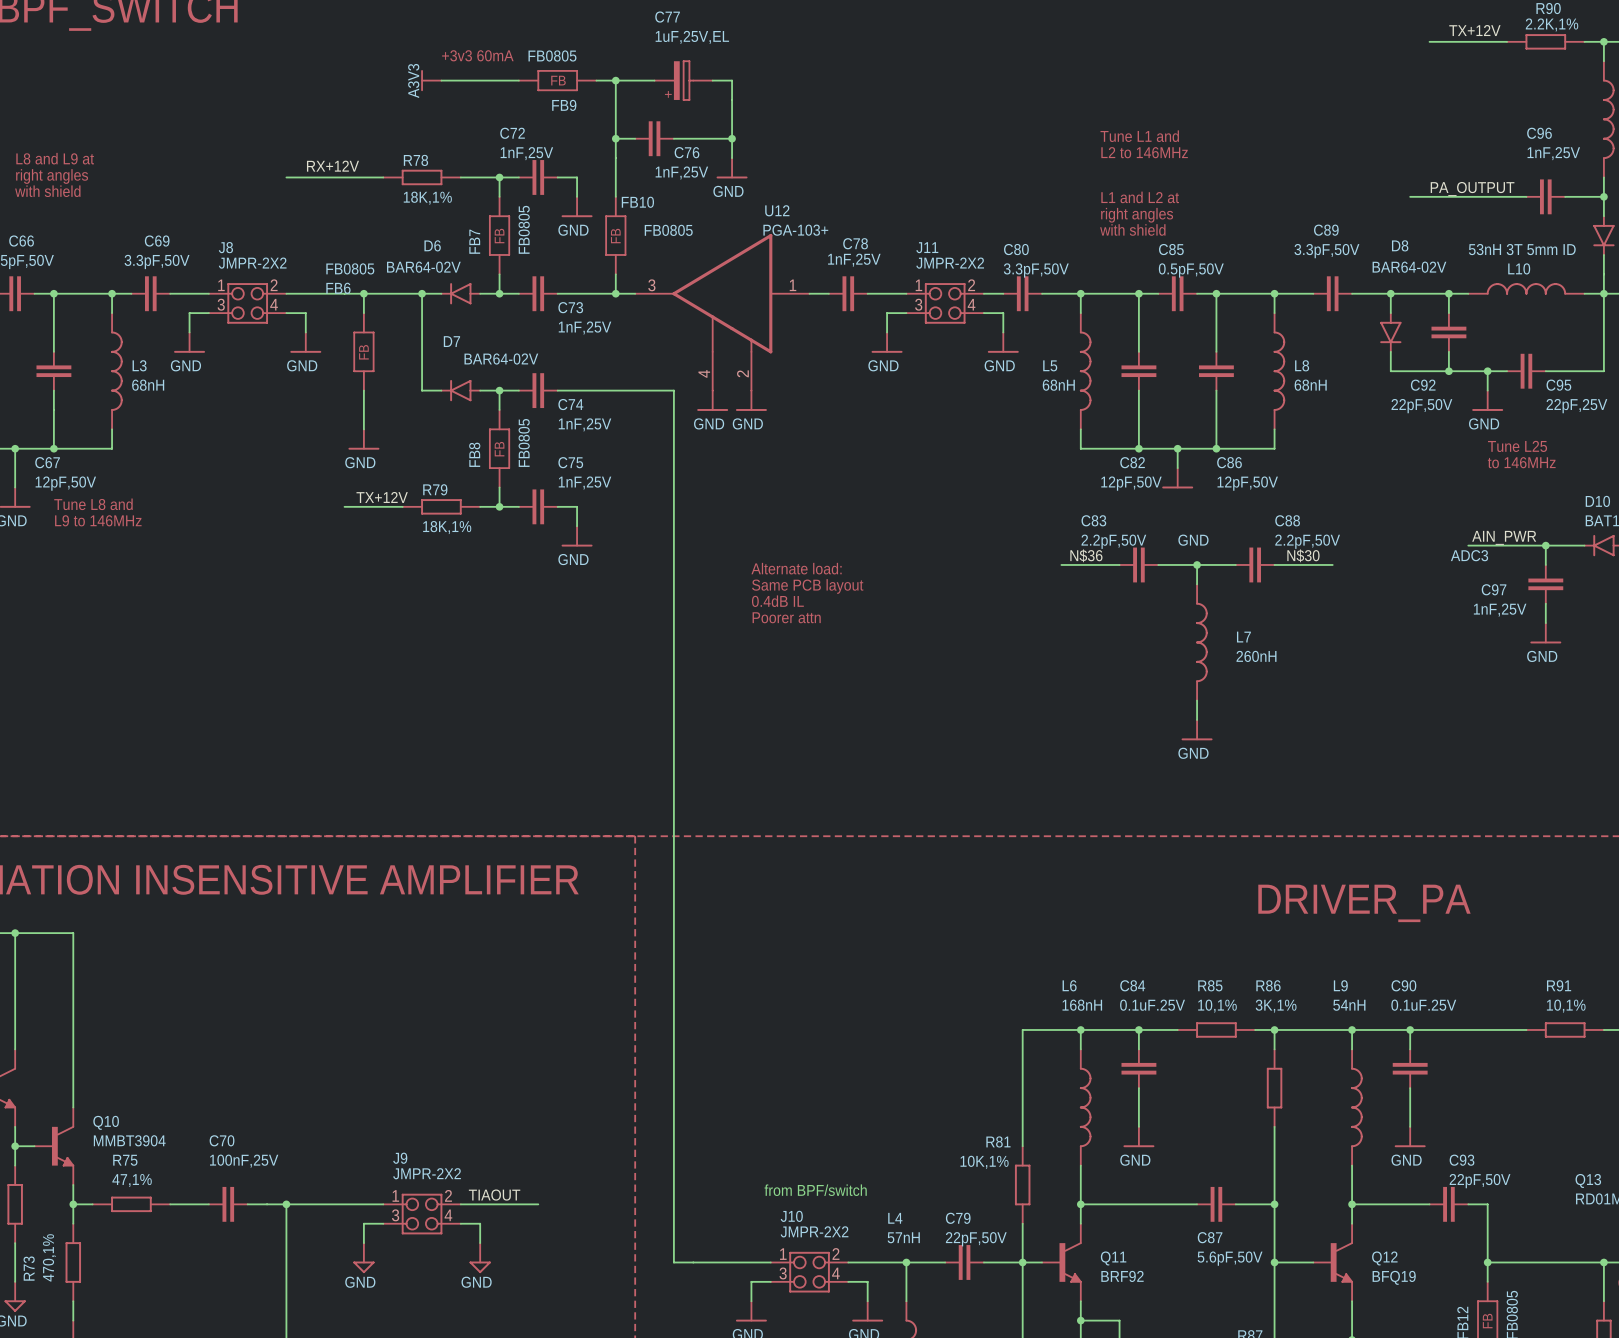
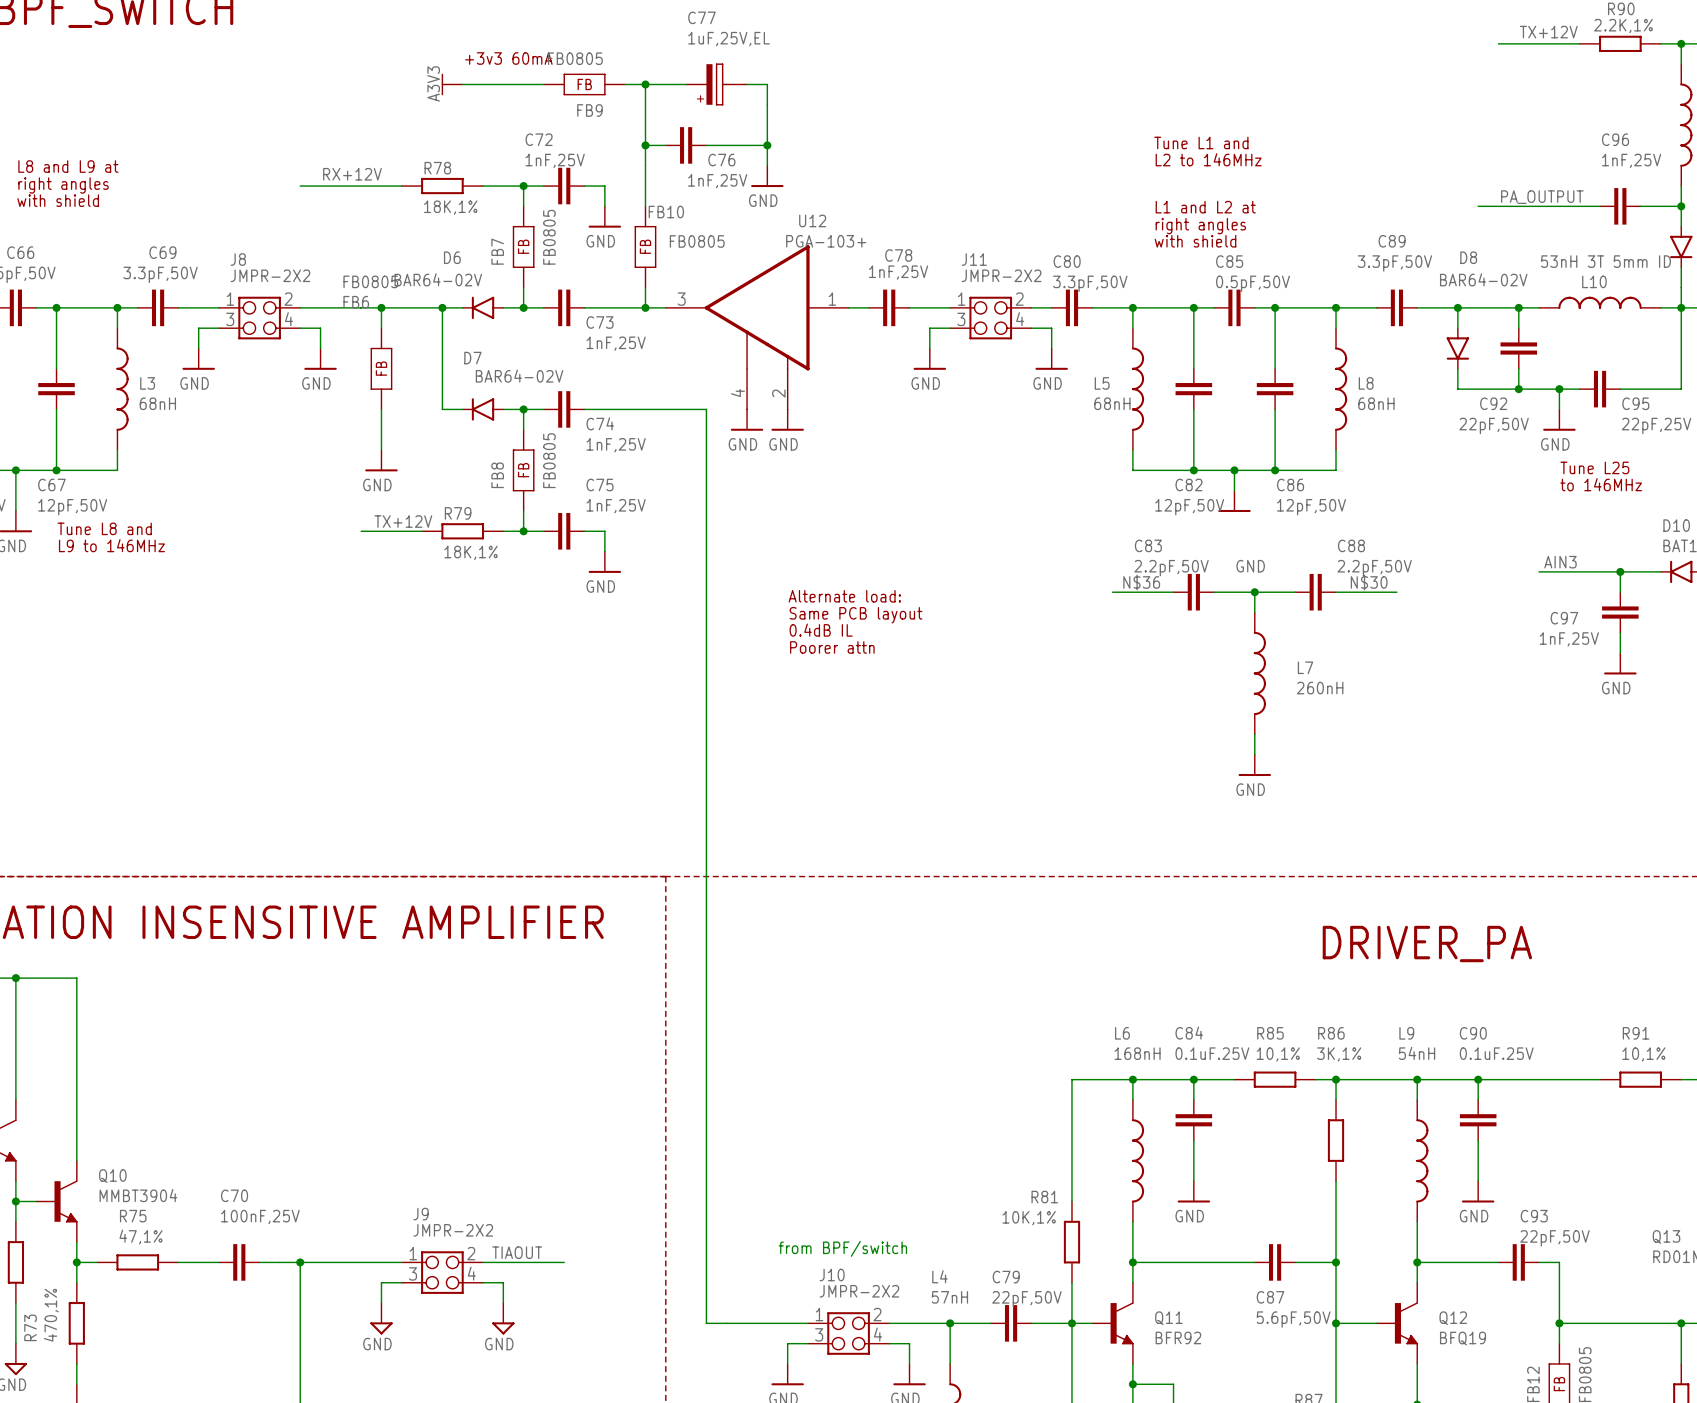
label: AIN_PWR (1504, 537) -> AIN3 (1560, 562)
text: ADC3 (1469, 555) -> none
Q11 value: BRF92 (1122, 1276) -> BFR92 (1178, 1337)

